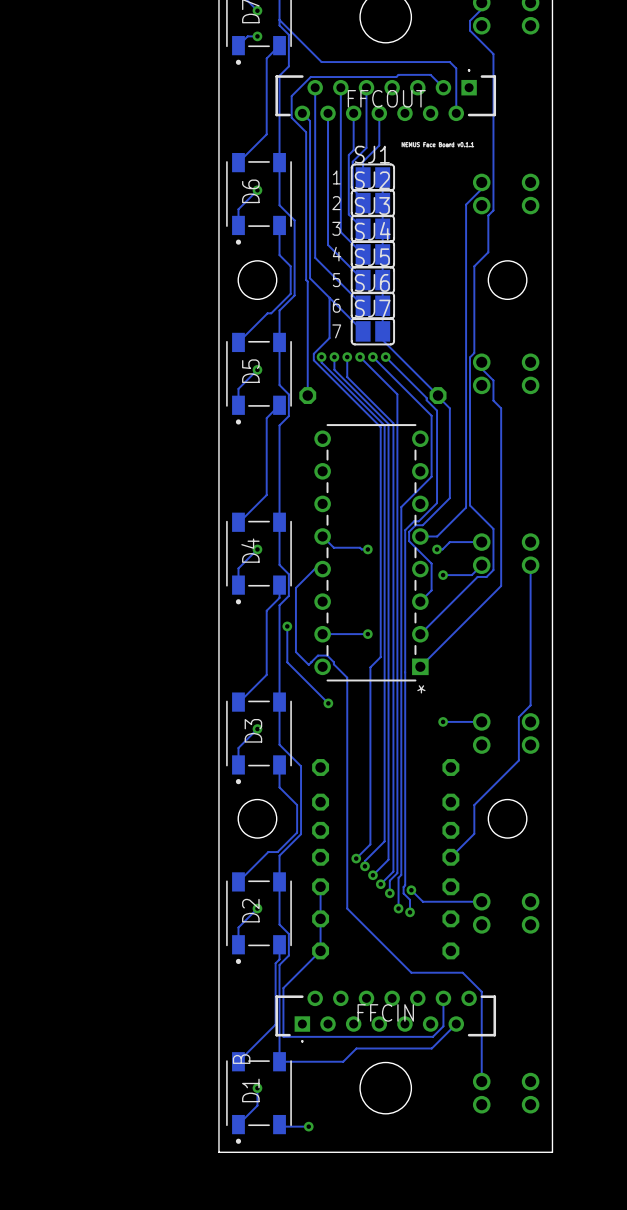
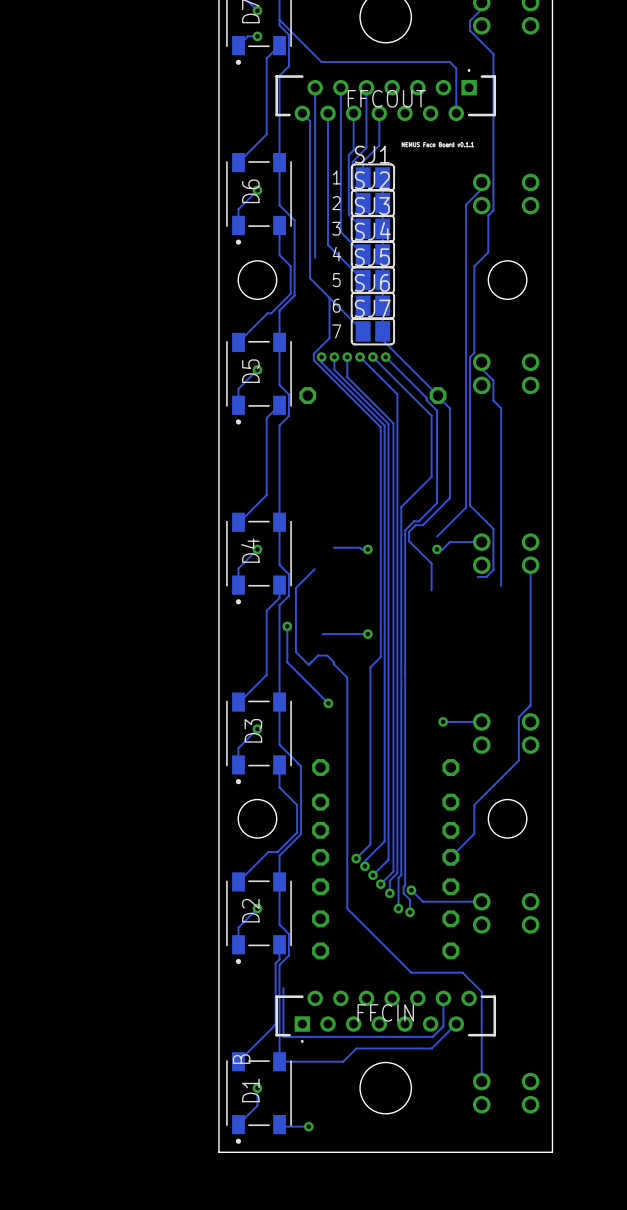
track: (443, 87) (430, 74) (398, 74) (396, 77) (310, 77) (291, 96) (291, 117) (306, 132) (307, 395) -> none
track: (315, 257) (363, 305) -> none
track: (322, 536) (333, 547) -> none
track: (437, 536) (420, 536) -> none
part: (371, 552) -> none
track: (481, 565) (471, 575) (443, 575) -> none
via: (443, 575) -> none
track: (477, 576) (420, 634) -> none
track: (501, 586) (420, 666) -> none
track: (431, 590) (420, 601) -> none
track: (320, 886) (320, 950) (283, 988) -> none

